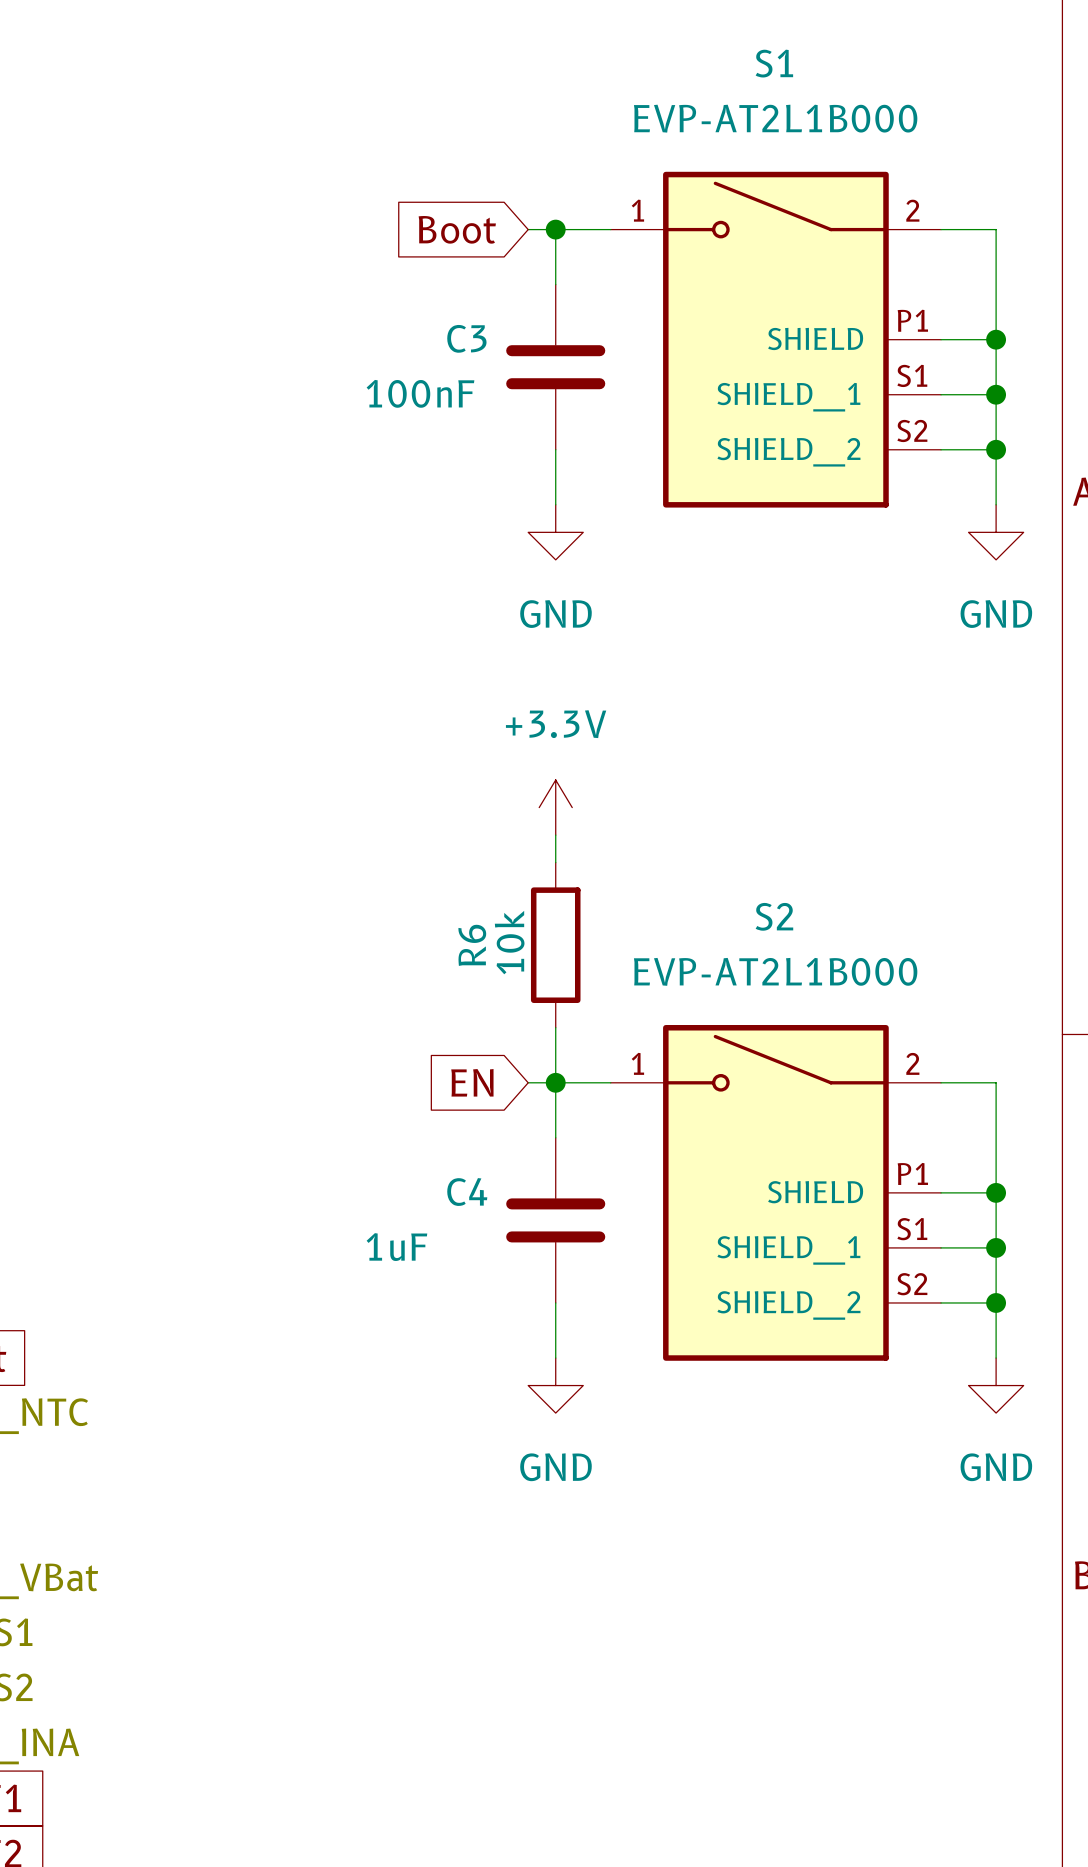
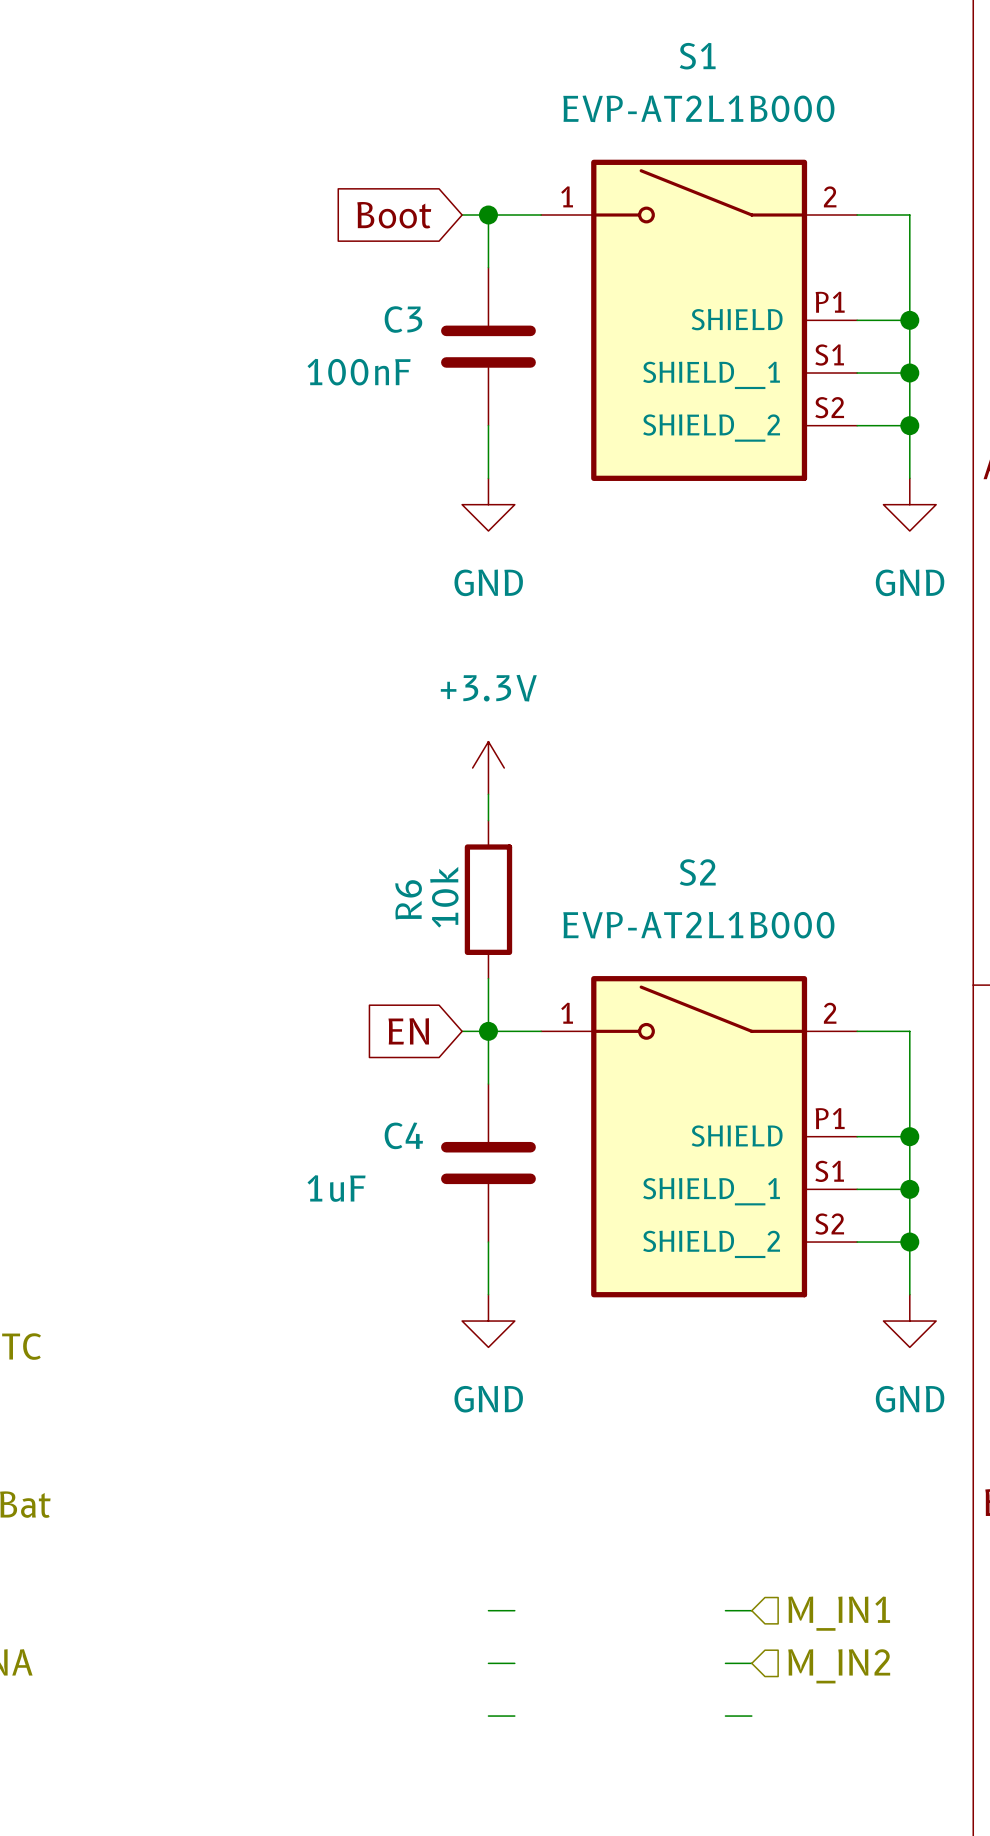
wire: none -> (488, 1610) (514, 1610)
wire: none -> (725, 1610) (751, 1610)
hierarchical label: none -> M_IN1 (839, 1613)
wire: none -> (488, 1663) (514, 1663)
wire: none -> (725, 1663) (751, 1663)
hierarchical label: none -> M_IN2 (839, 1666)
wire: none -> (488, 1716) (514, 1716)
wire: none -> (725, 1716) (751, 1716)

